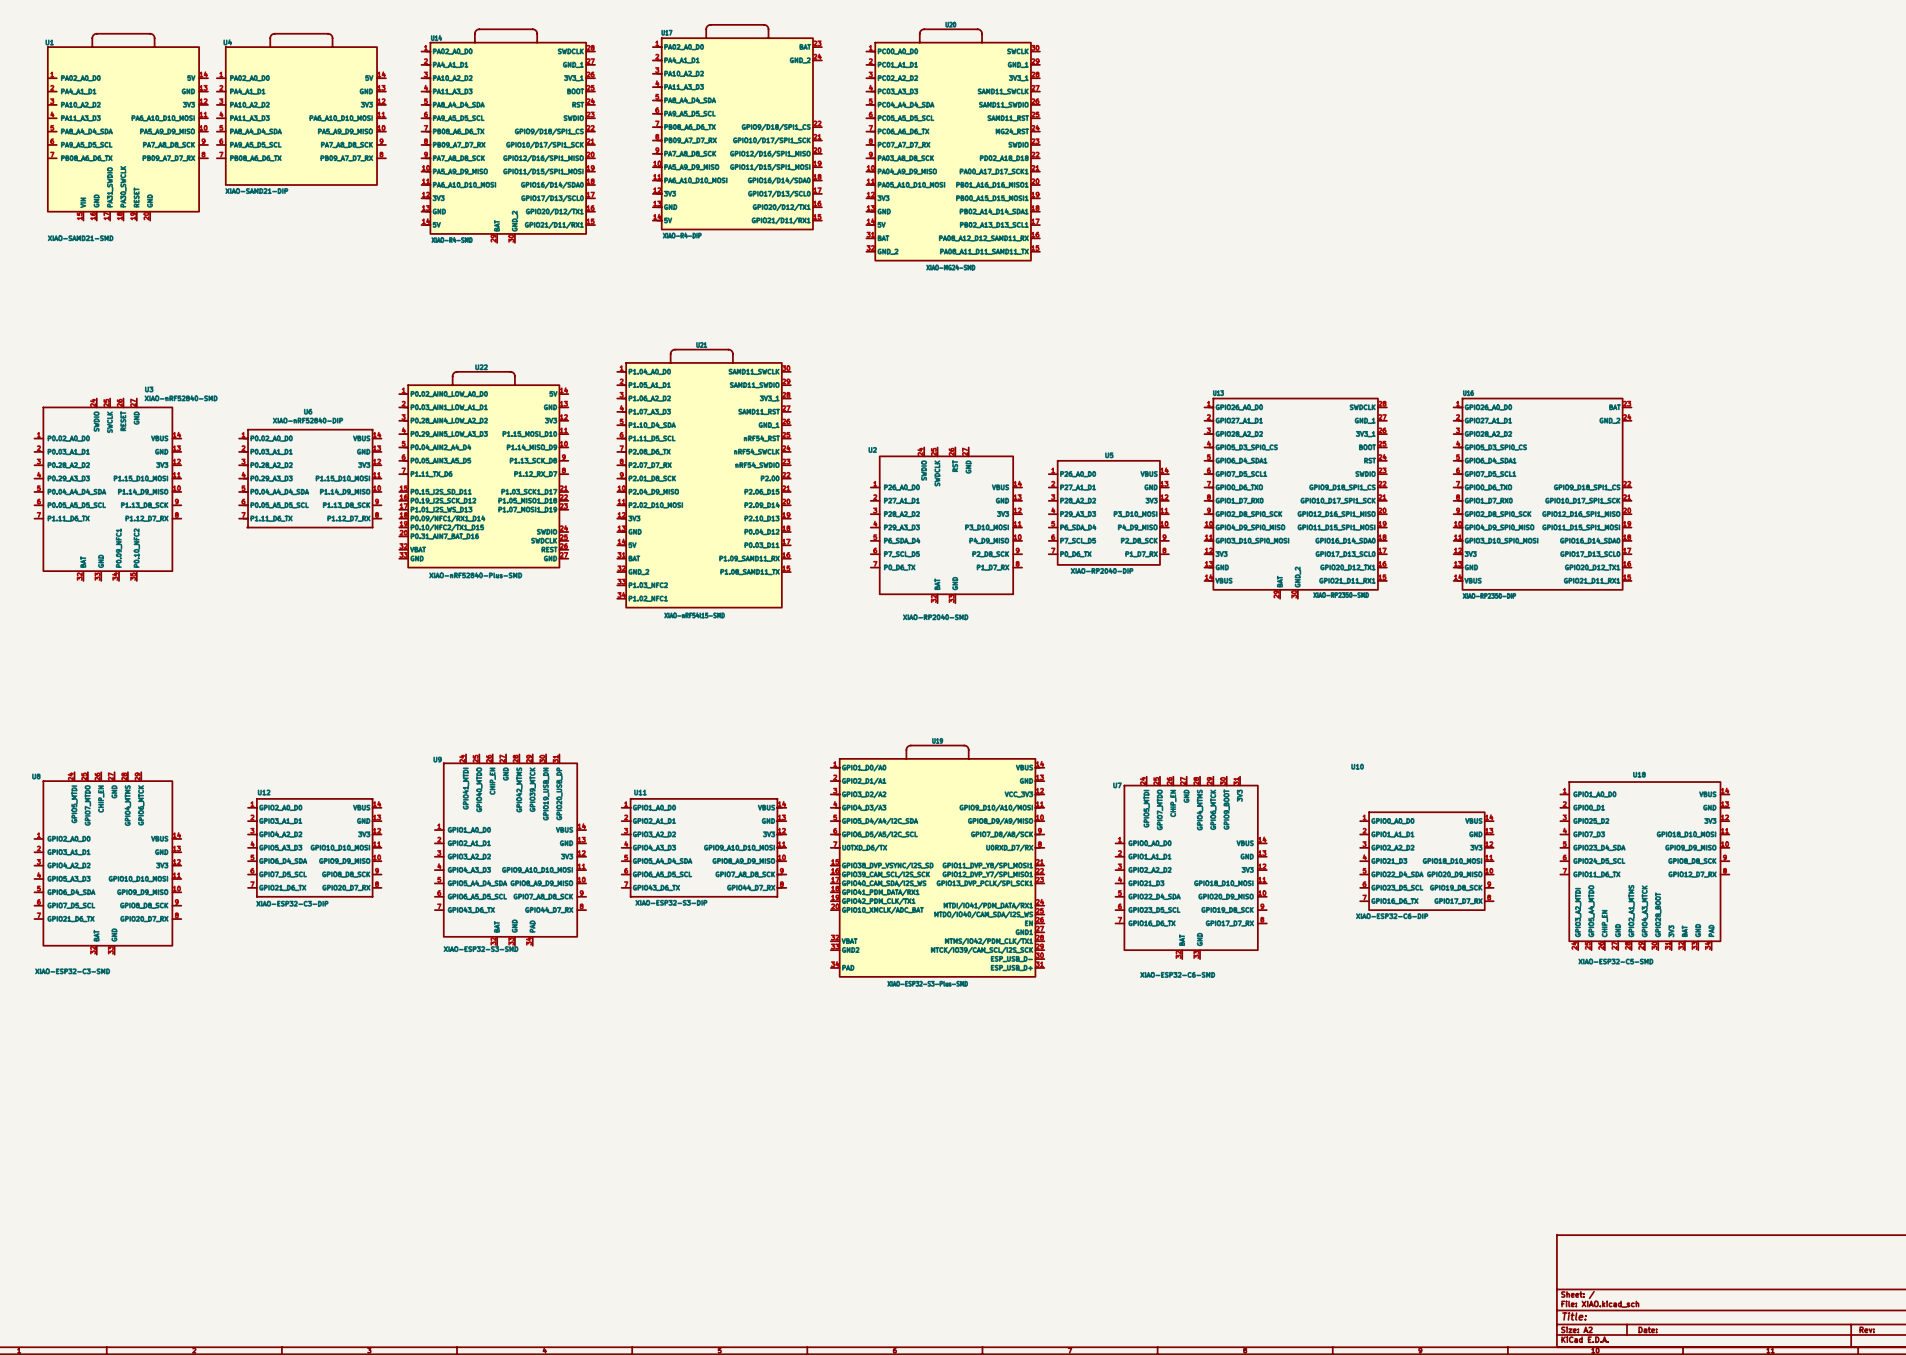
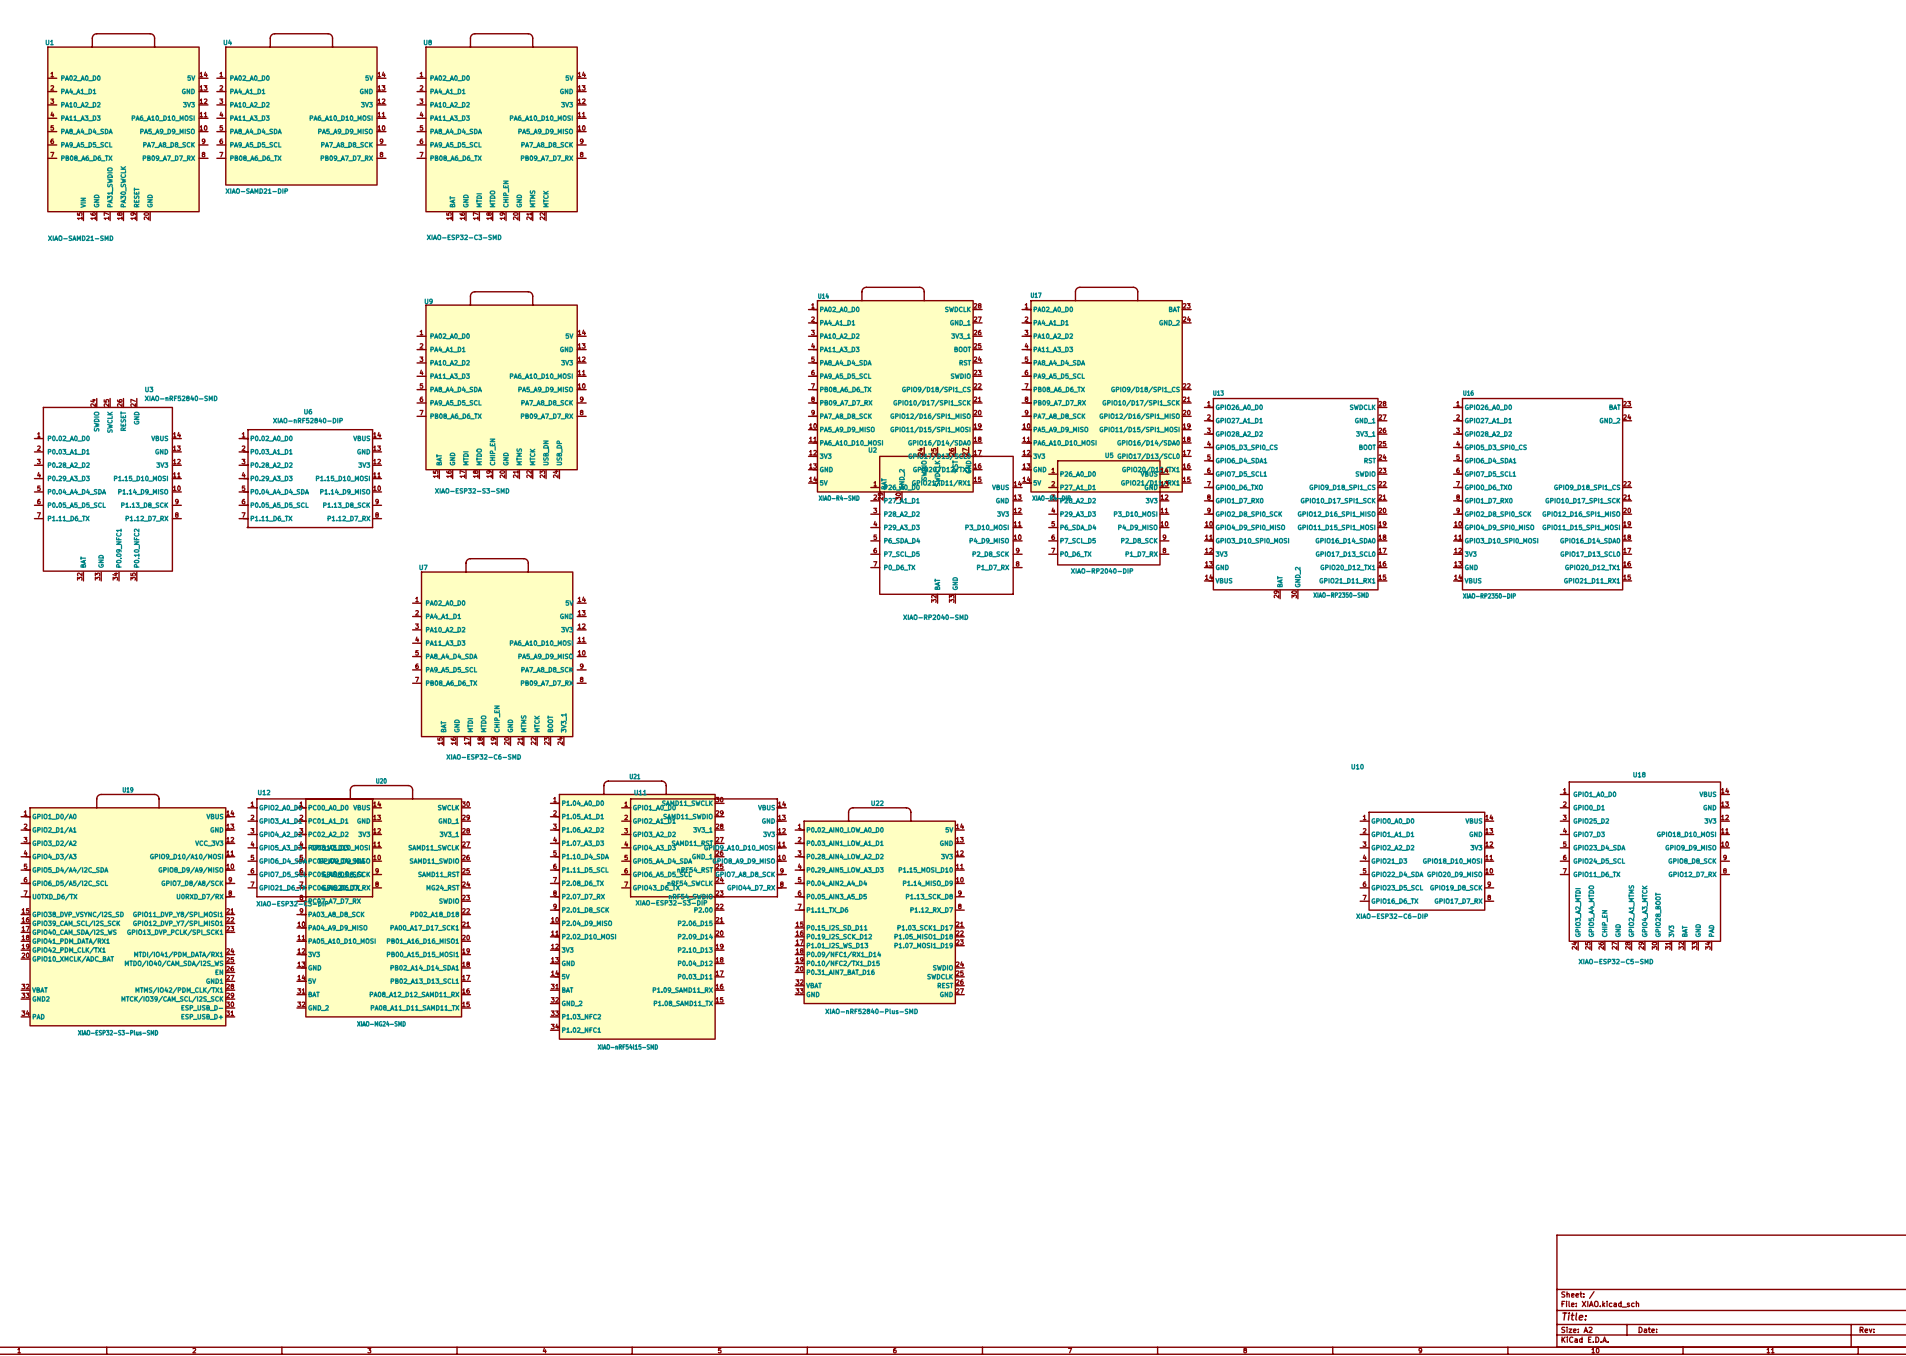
part position: (737, 127) -> (1106, 389)
part position: (508, 136) -> (895, 394)
part position: (953, 144) -> (383, 901)
part position: (483, 469) -> (879, 905)
part position: (704, 478) -> (637, 910)
part symbol: [434, 754, 587, 946] -> [417, 291, 587, 479]
part symbol: [34, 772, 182, 955] -> [417, 33, 587, 221]
part symbol: [1115, 776, 1267, 960] -> [412, 558, 587, 746]
part position: (937, 861) -> (127, 910)

